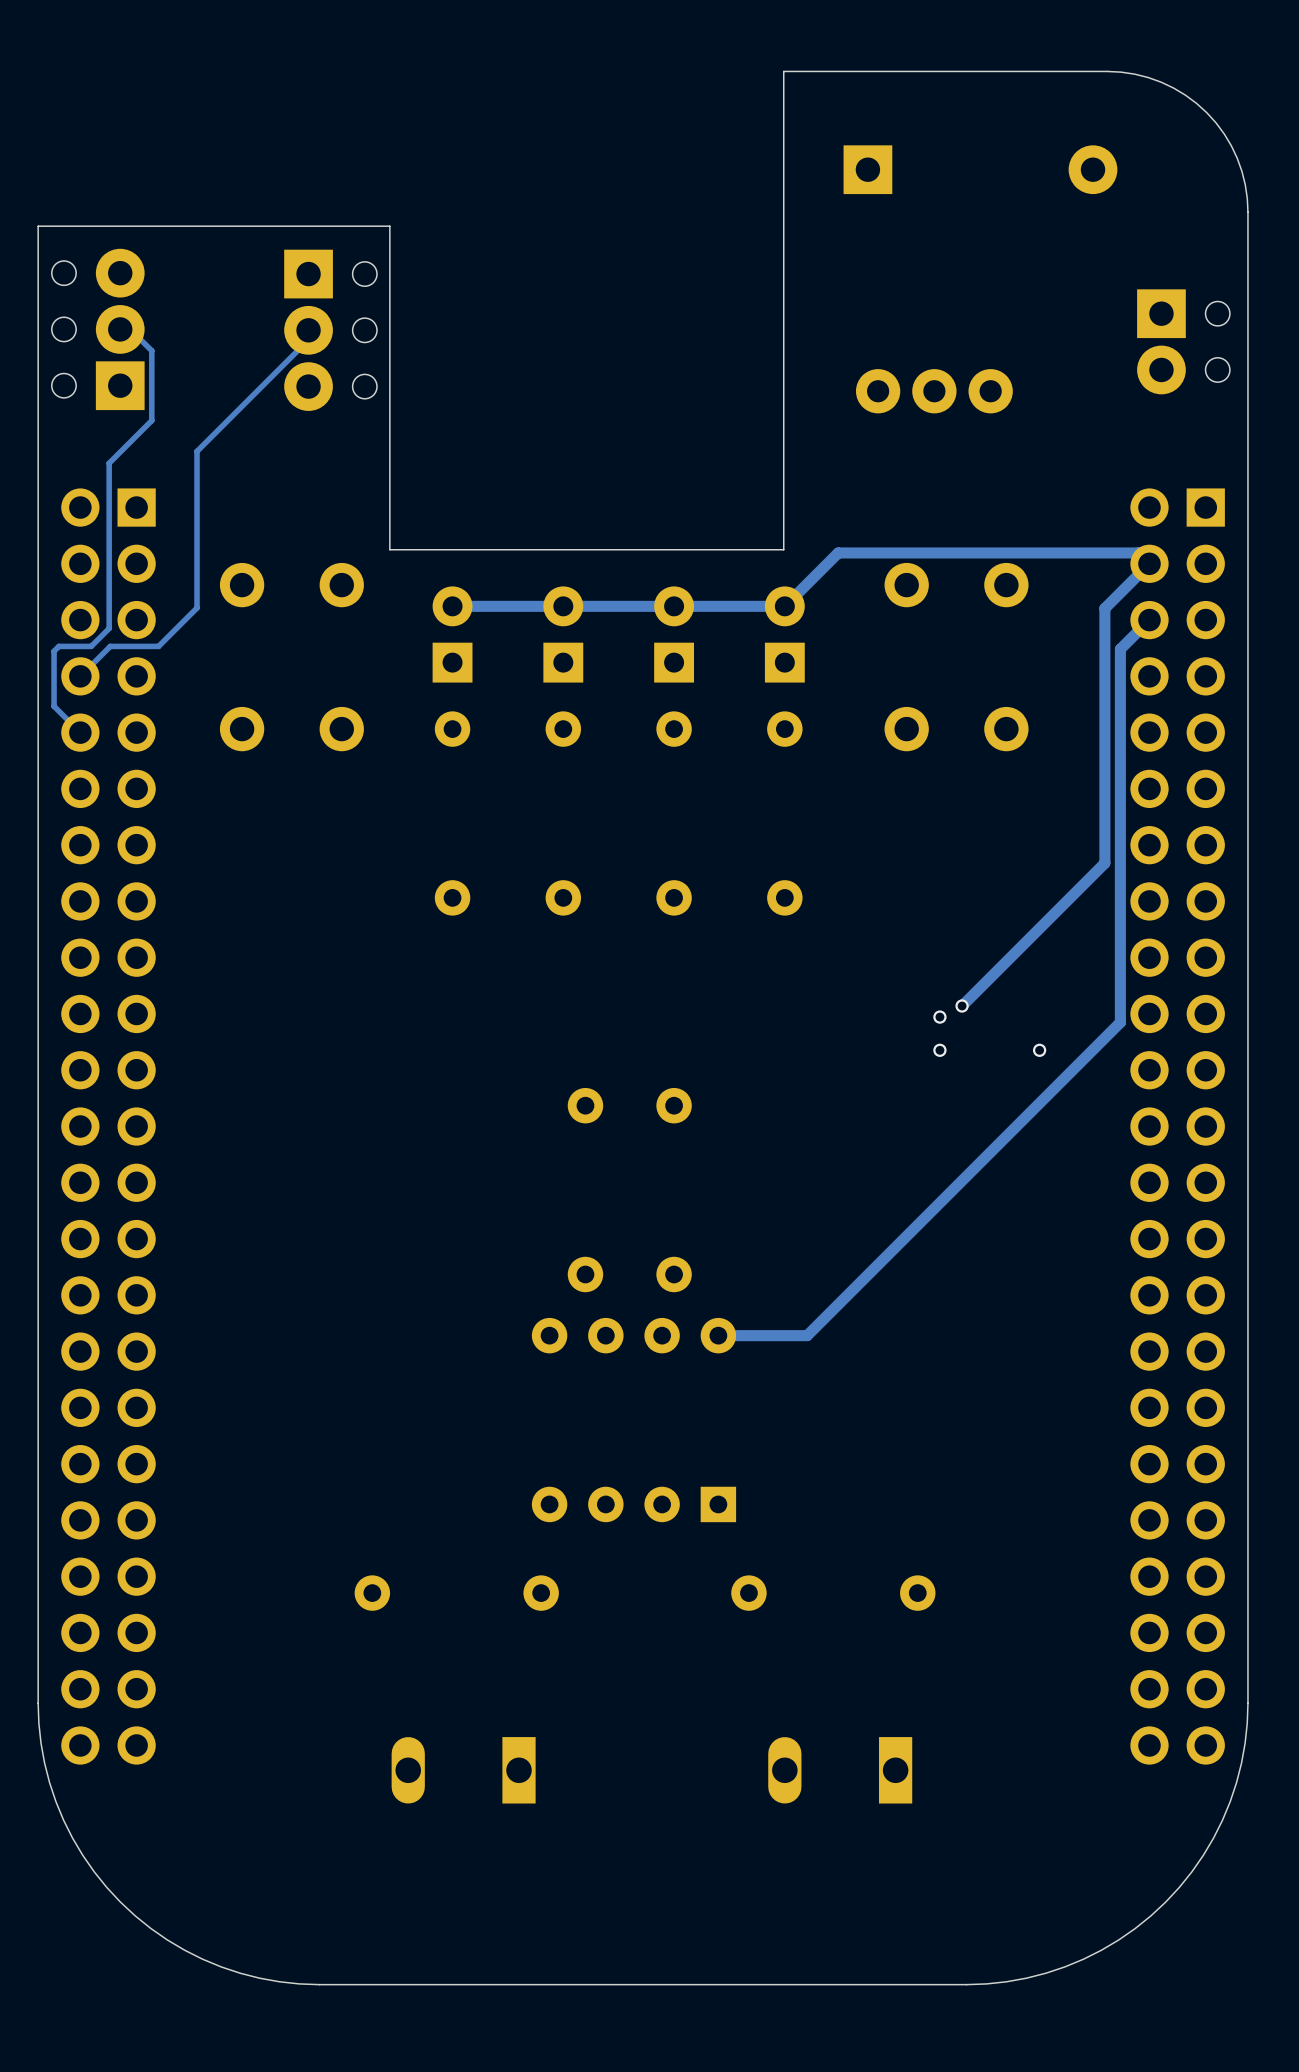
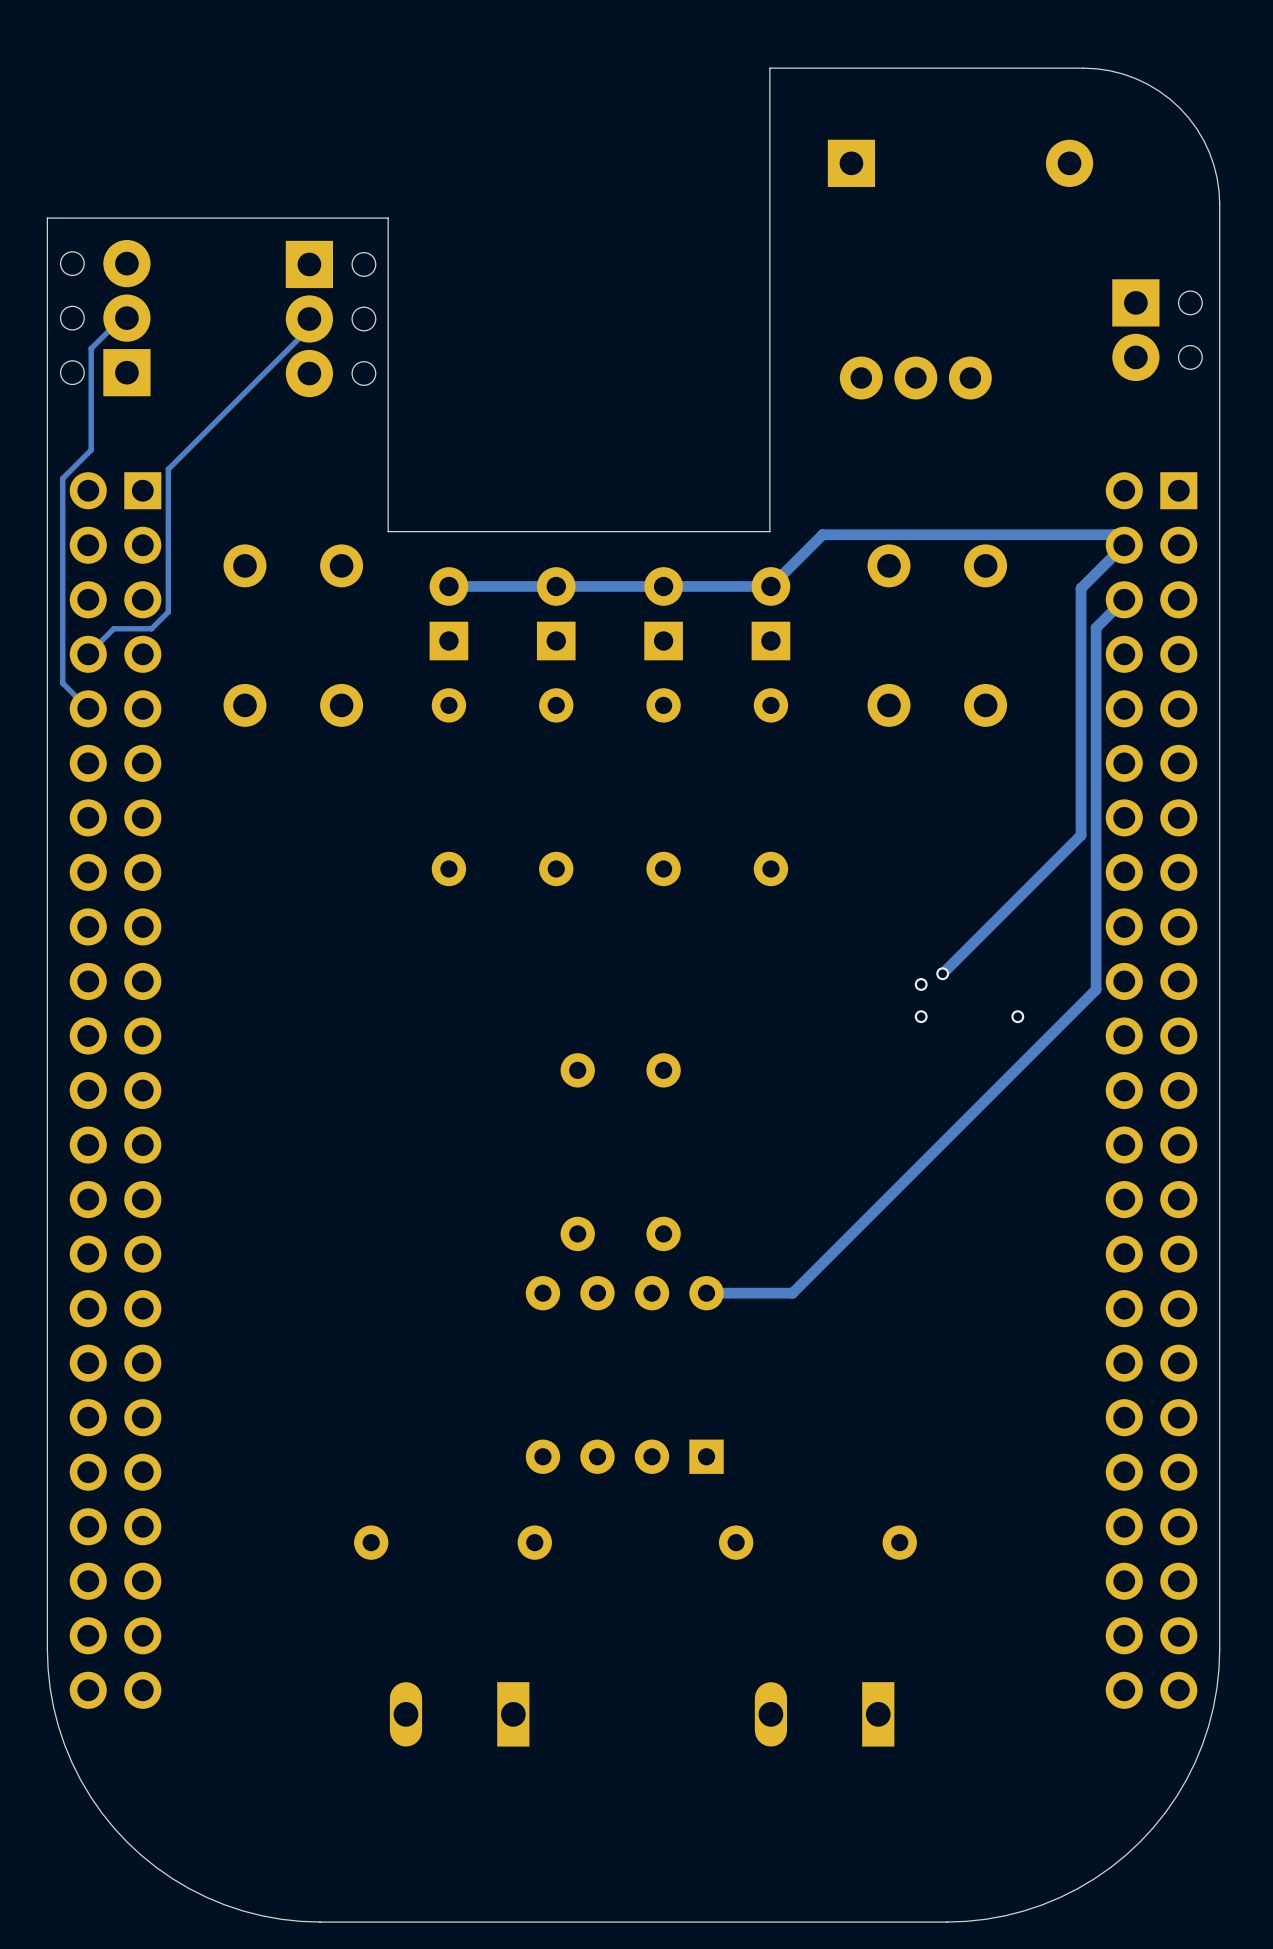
track: (120, 329) (130, 329) (151, 350) (151, 420) (109, 463) (109, 628) (91, 646) (58, 646) (54, 651) -> (126, 318) (121, 318) (91, 348) (91, 450) (62, 478) (62, 630)
track: (197, 451) (197, 608) (158, 646) (110, 646) (106, 650) -> (201, 436) (168, 469) (168, 612) (151, 628) (113, 628)

